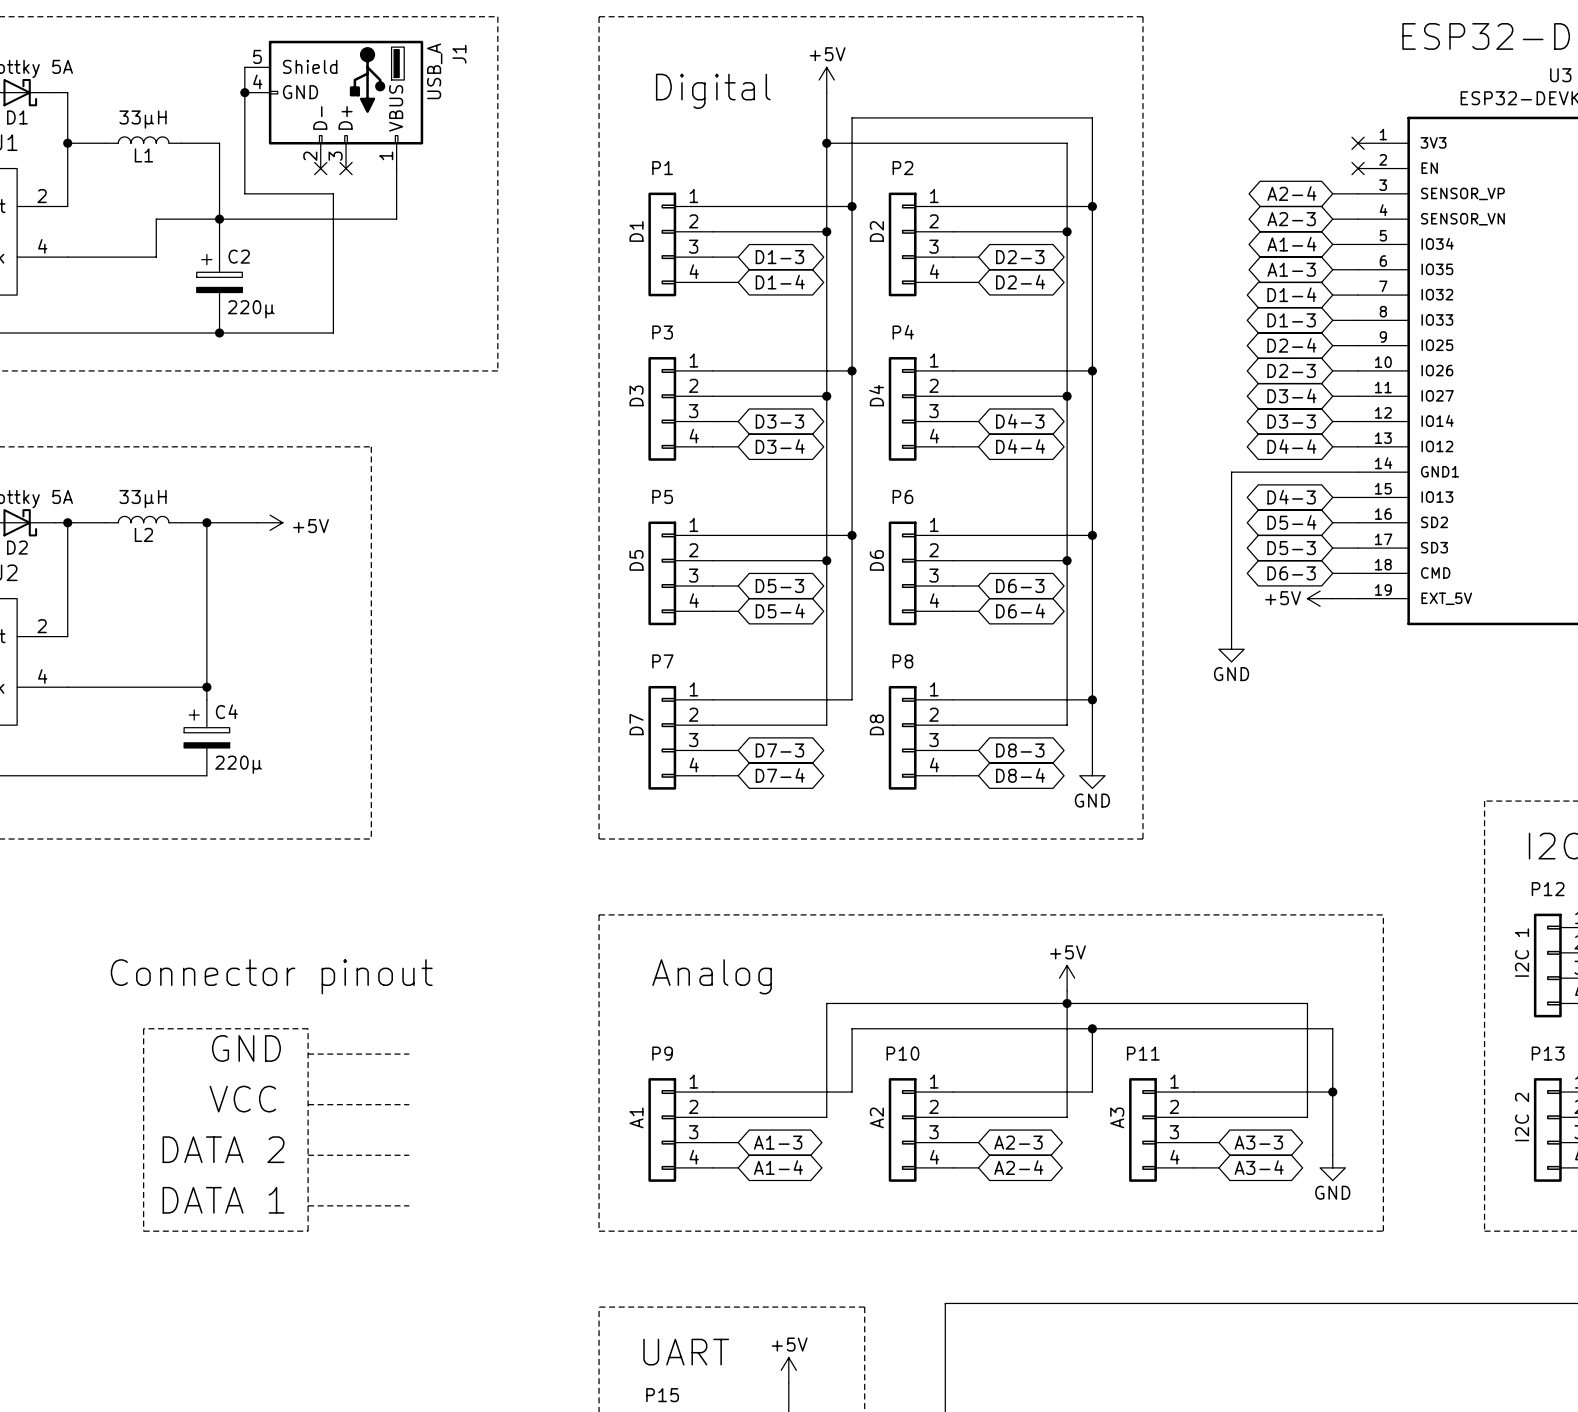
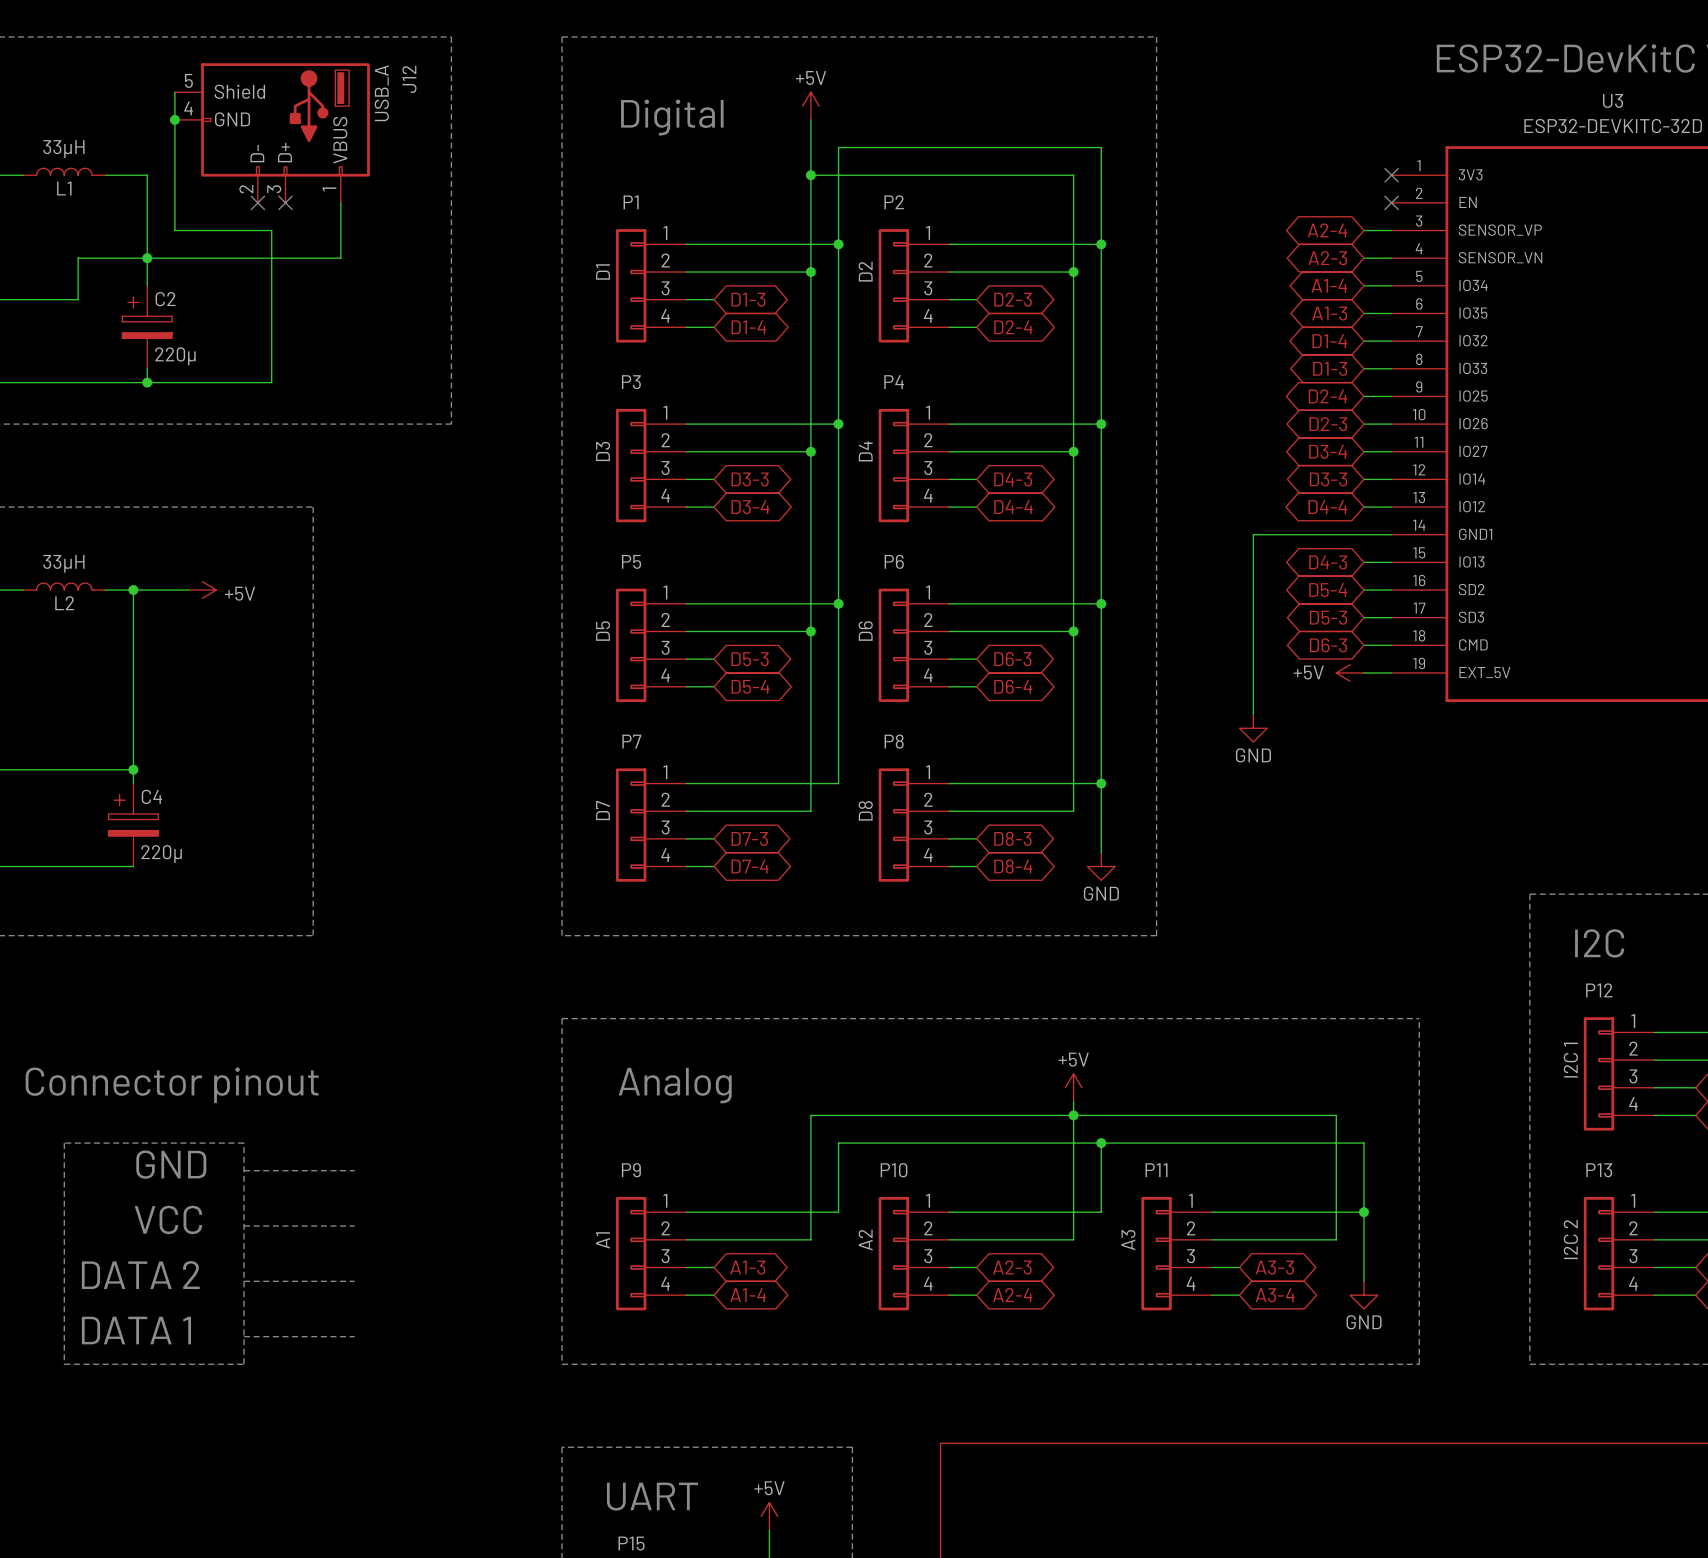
J1 name: J1 (459, 54) -> J12 (409, 79)

